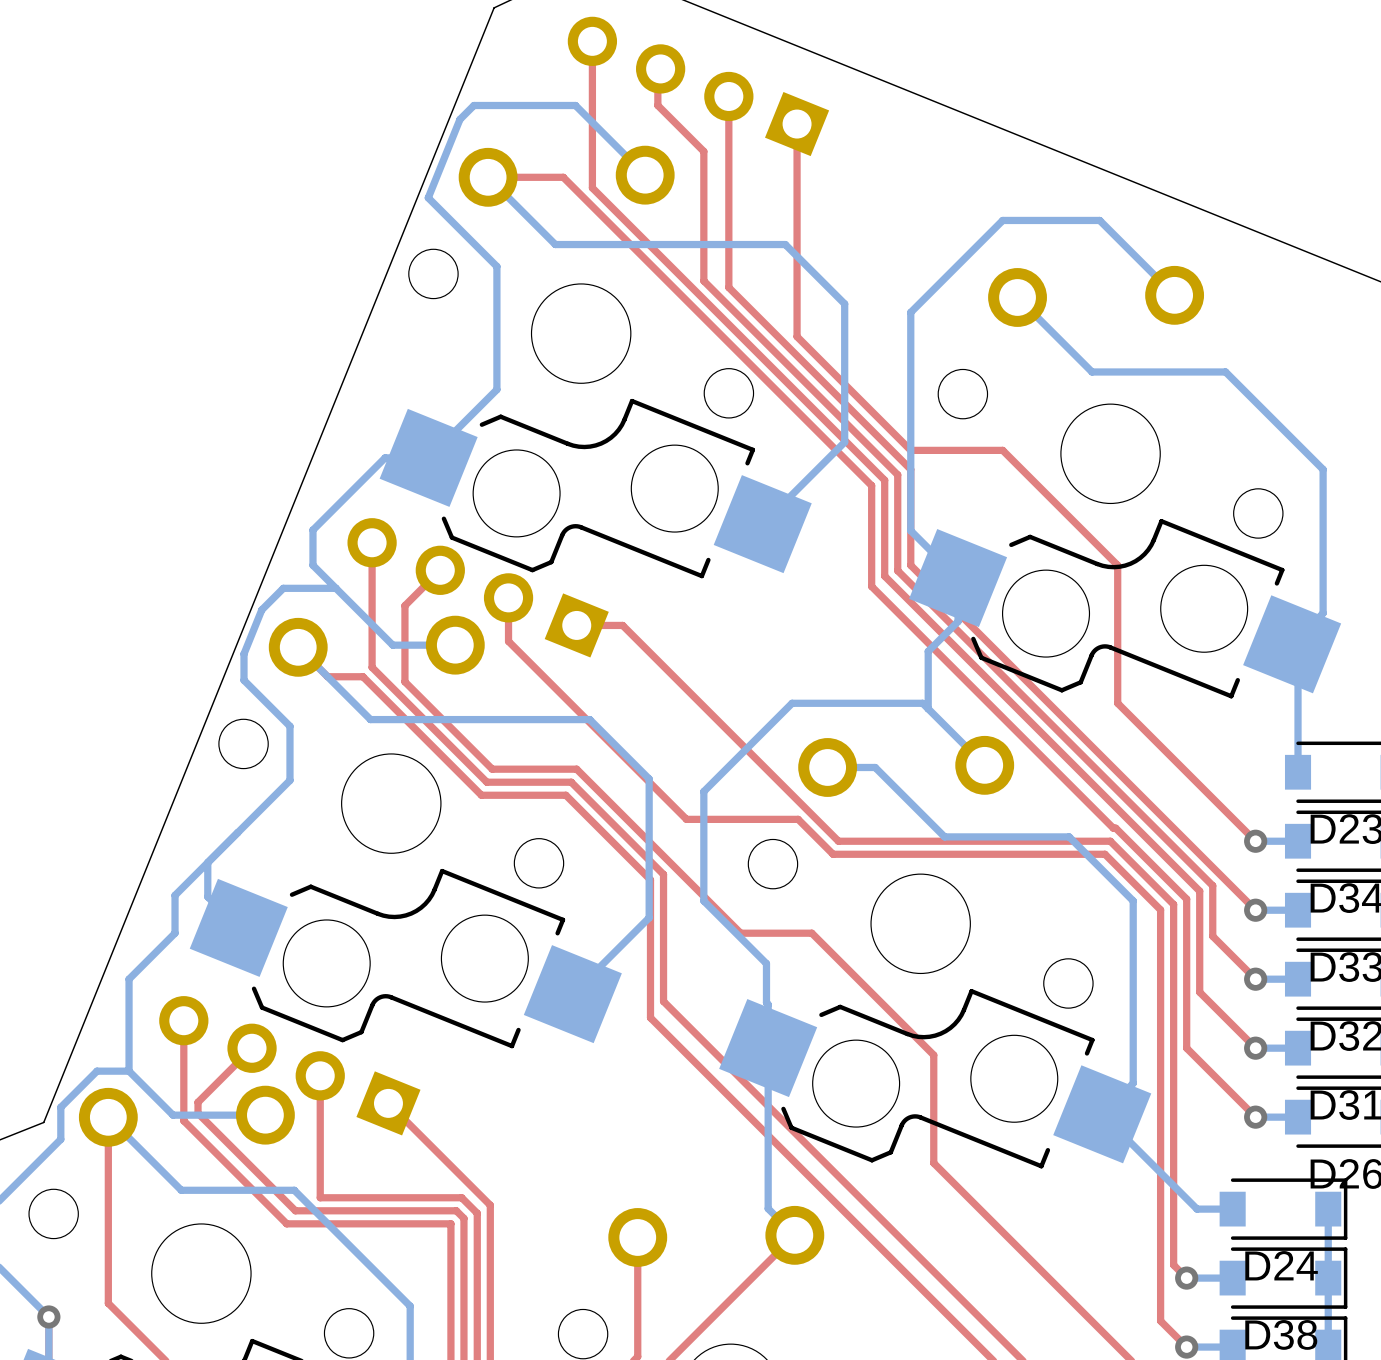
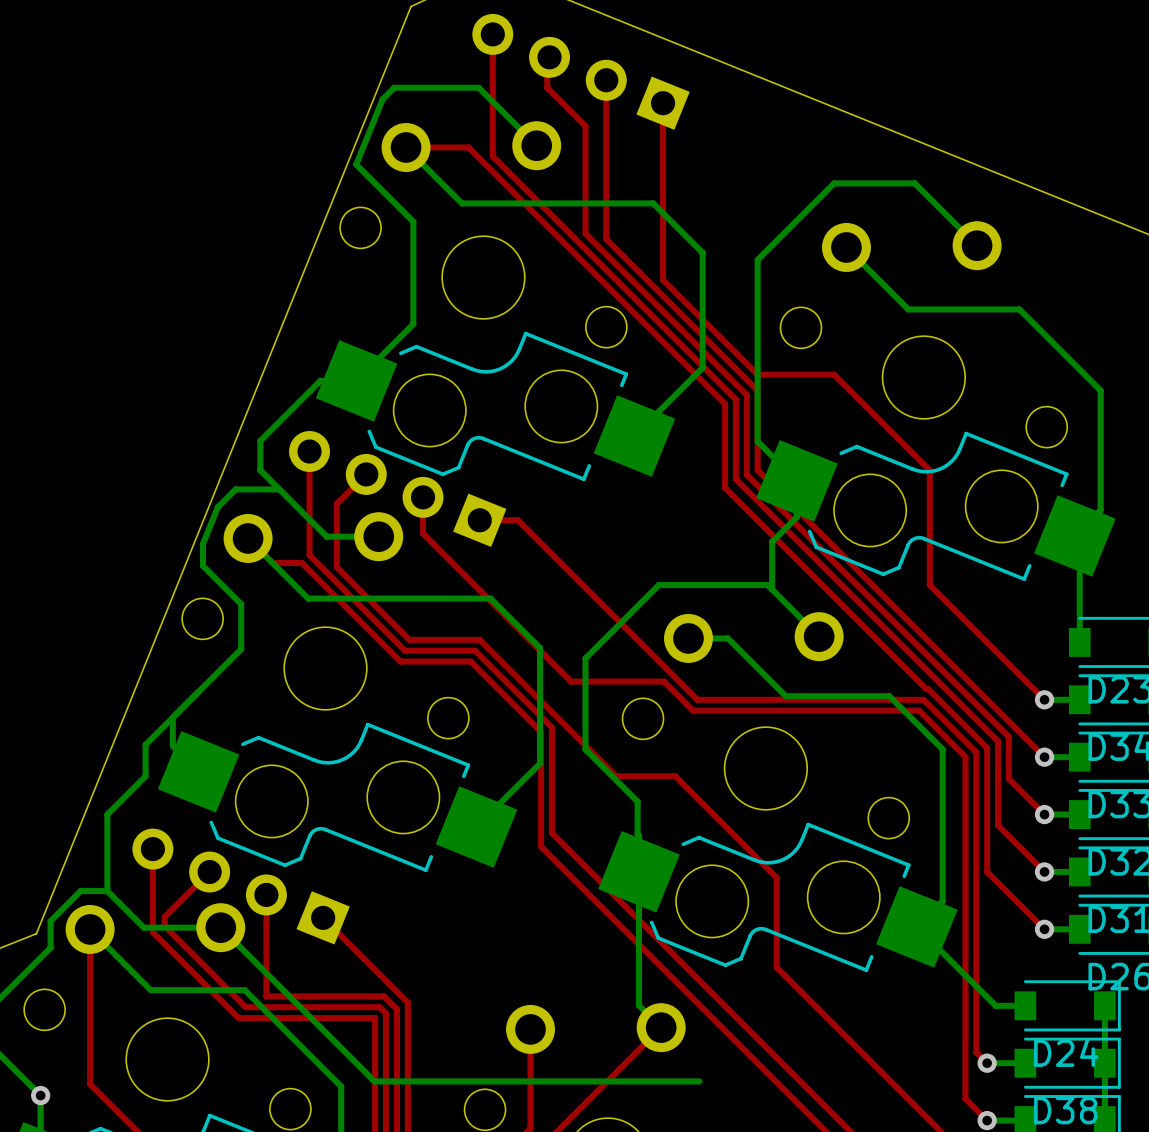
bottom track: none -> (220, 927) (374, 1081) (699, 1081)

